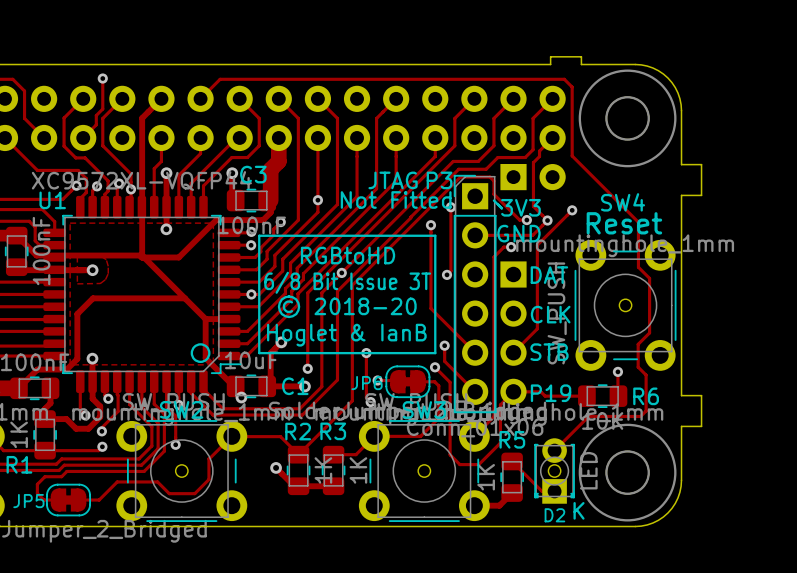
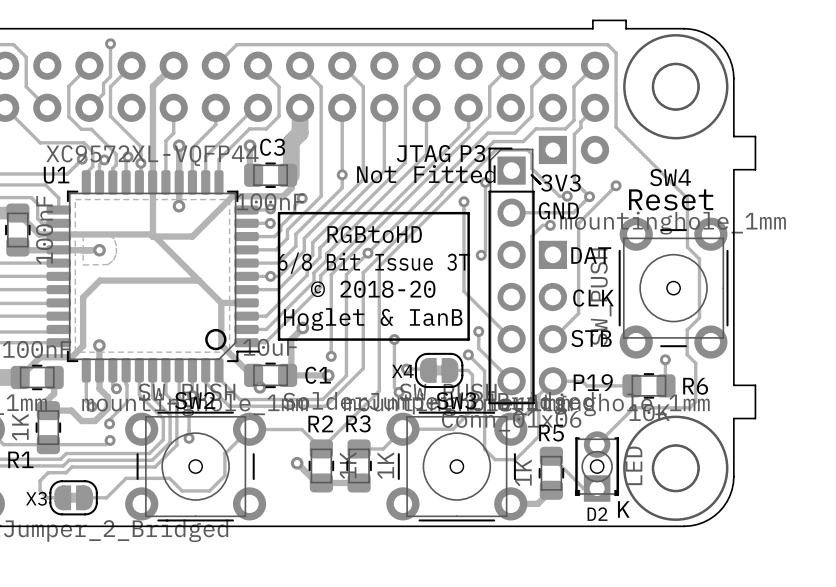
JP6 name: JP6 (367, 383) -> X4 (402, 371)
JP5 name: JP5 (28, 501) -> X3 (36, 498)

